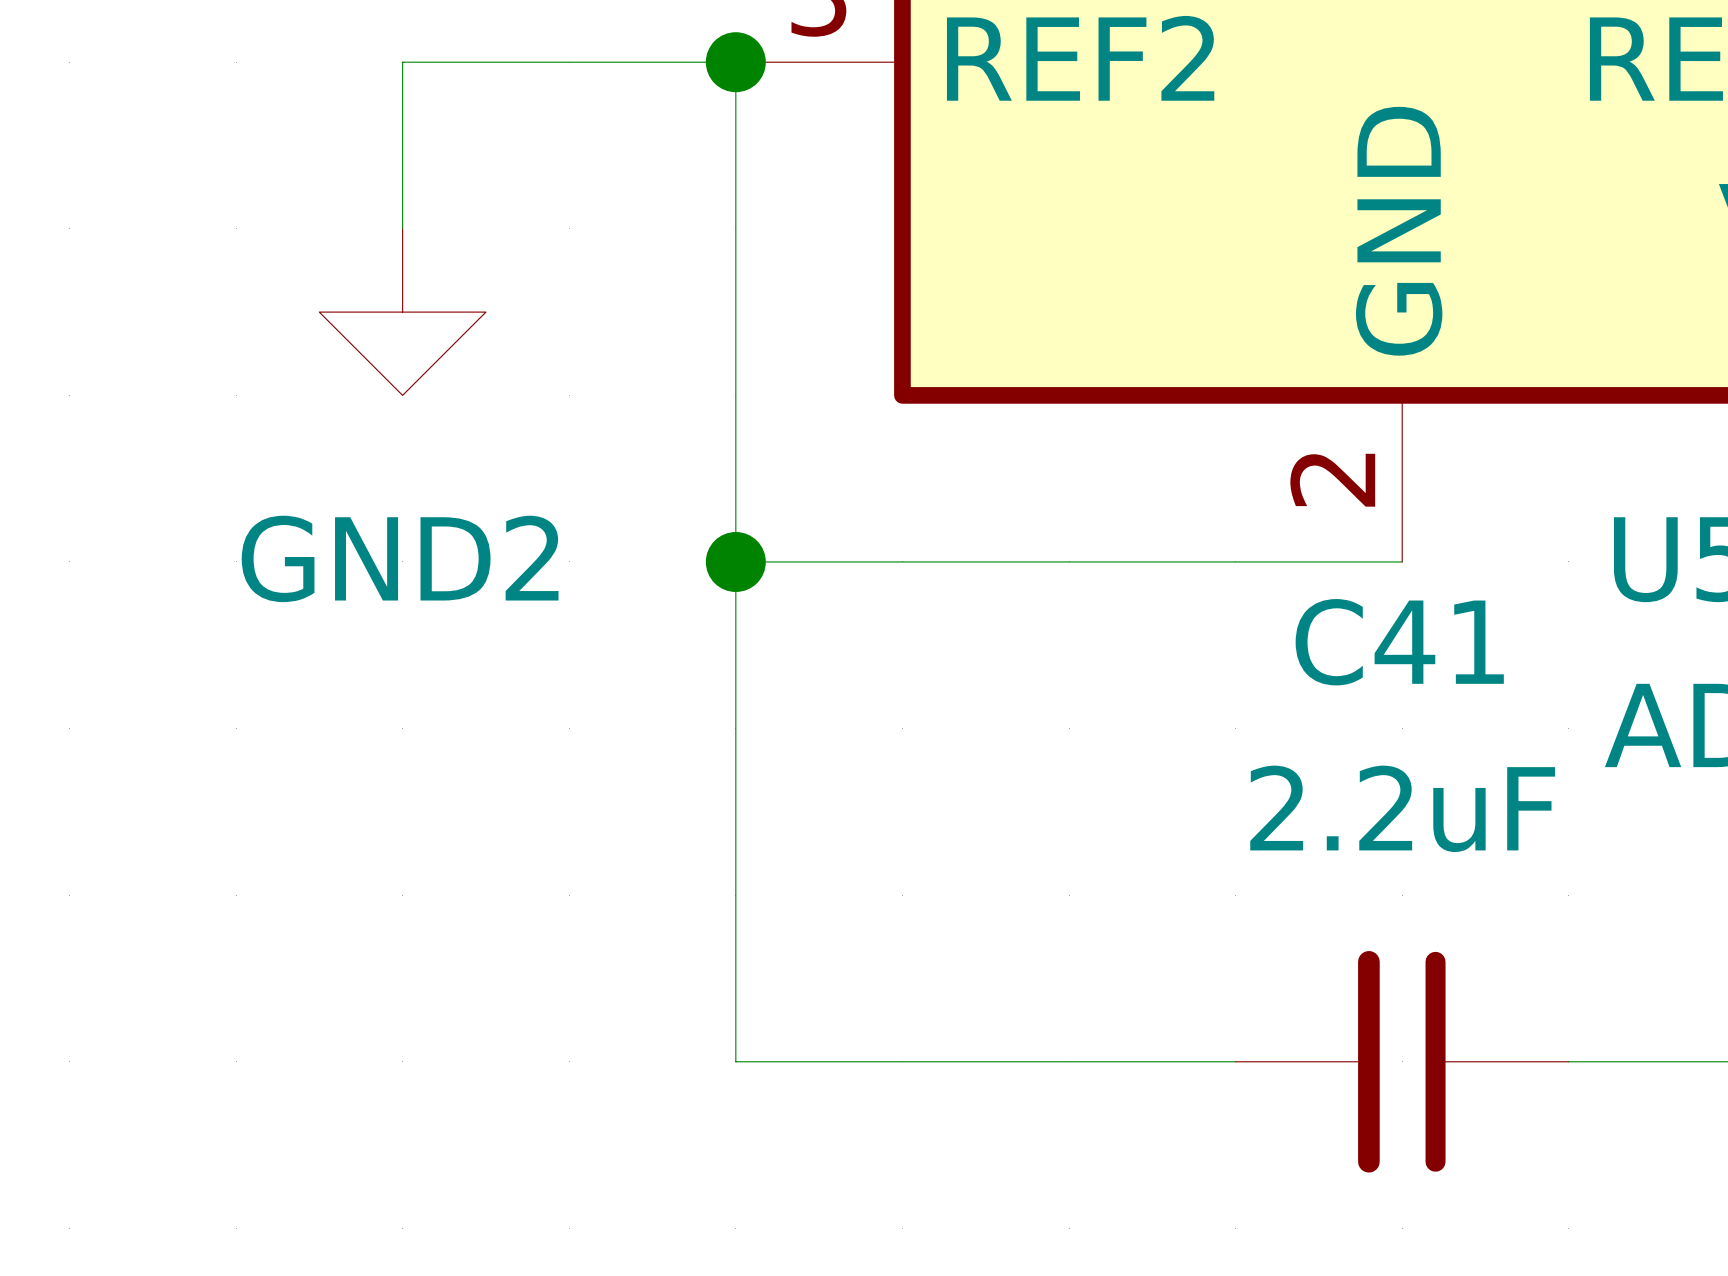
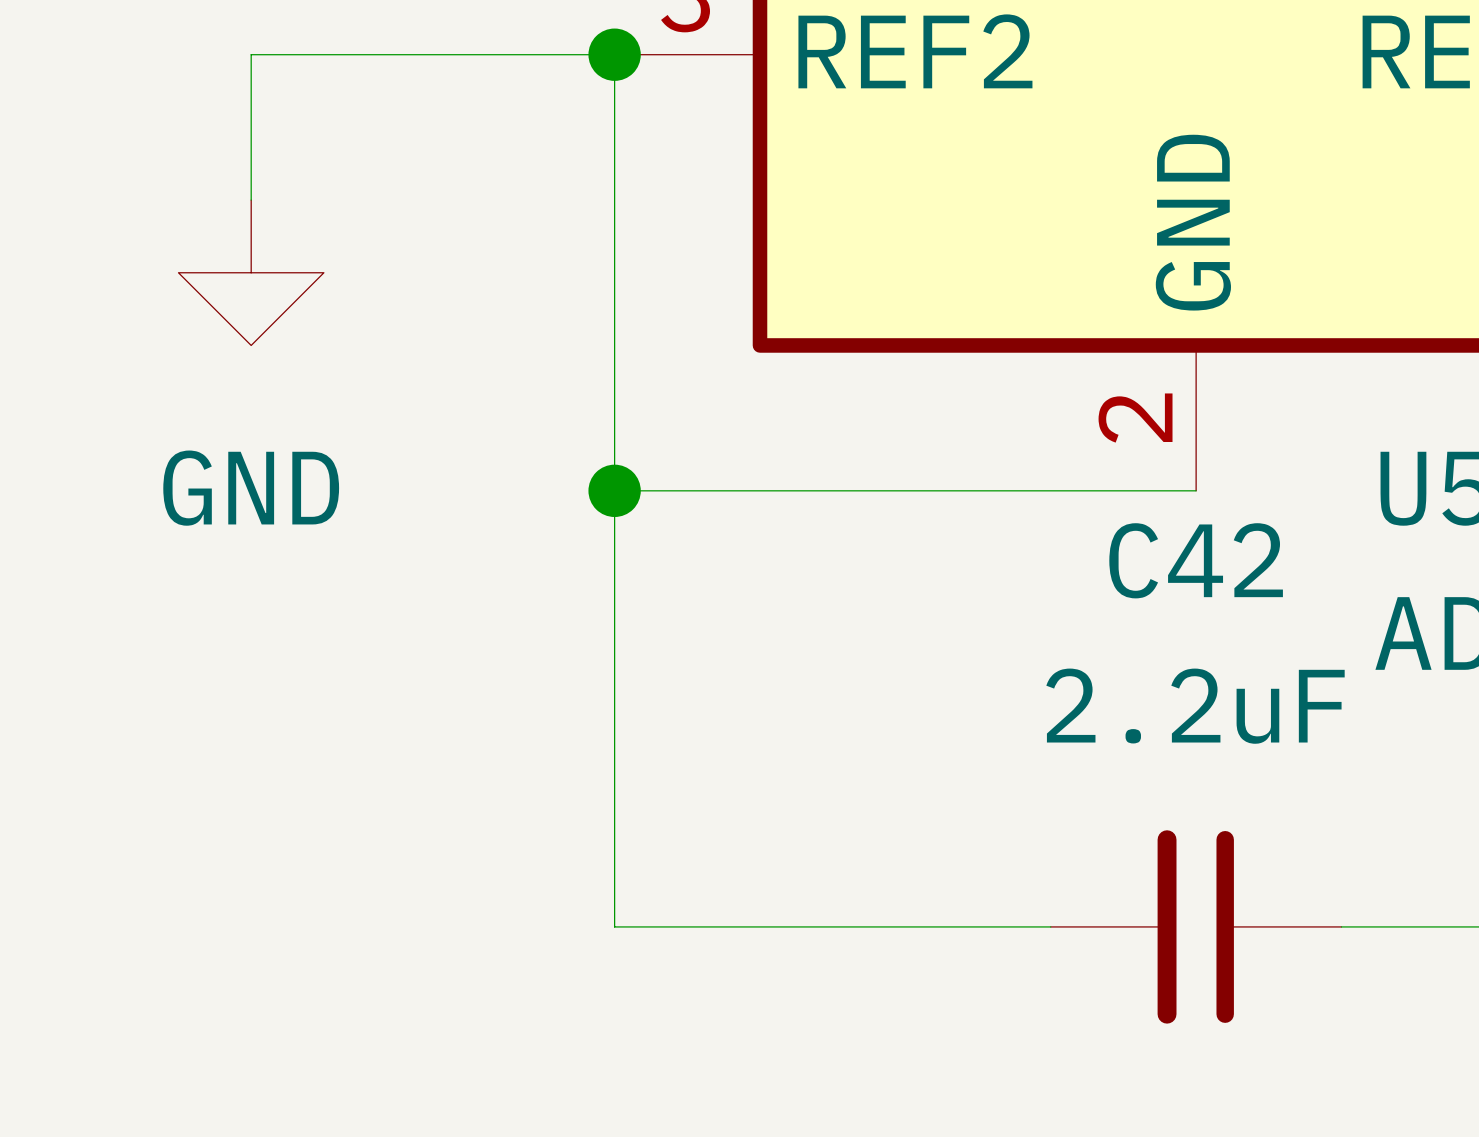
wire: (402, 62) (402, 228) -> (323, 54) (251, 54) (251, 200)
power symbol: none -> GND (251, 272)
power symbol: GND2 (402, 312) -> none
C41 name: C41 (1399, 642) -> C42 (1196, 560)

